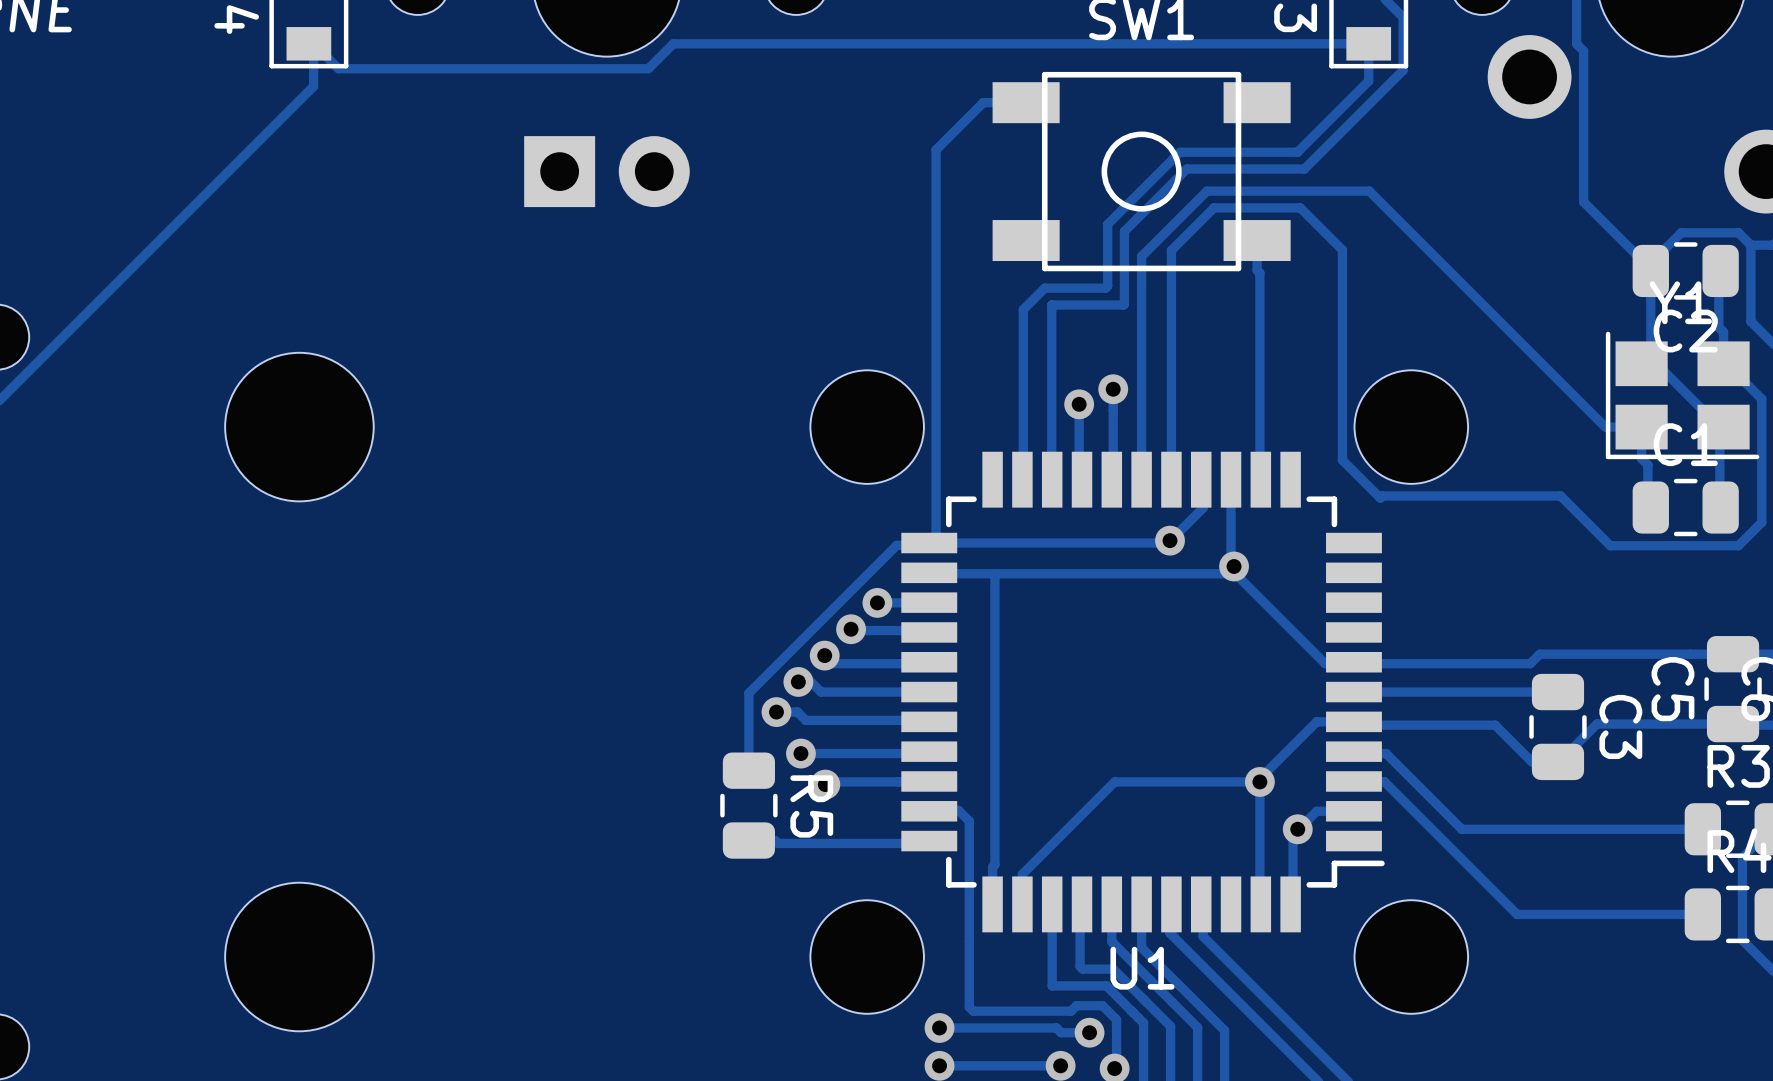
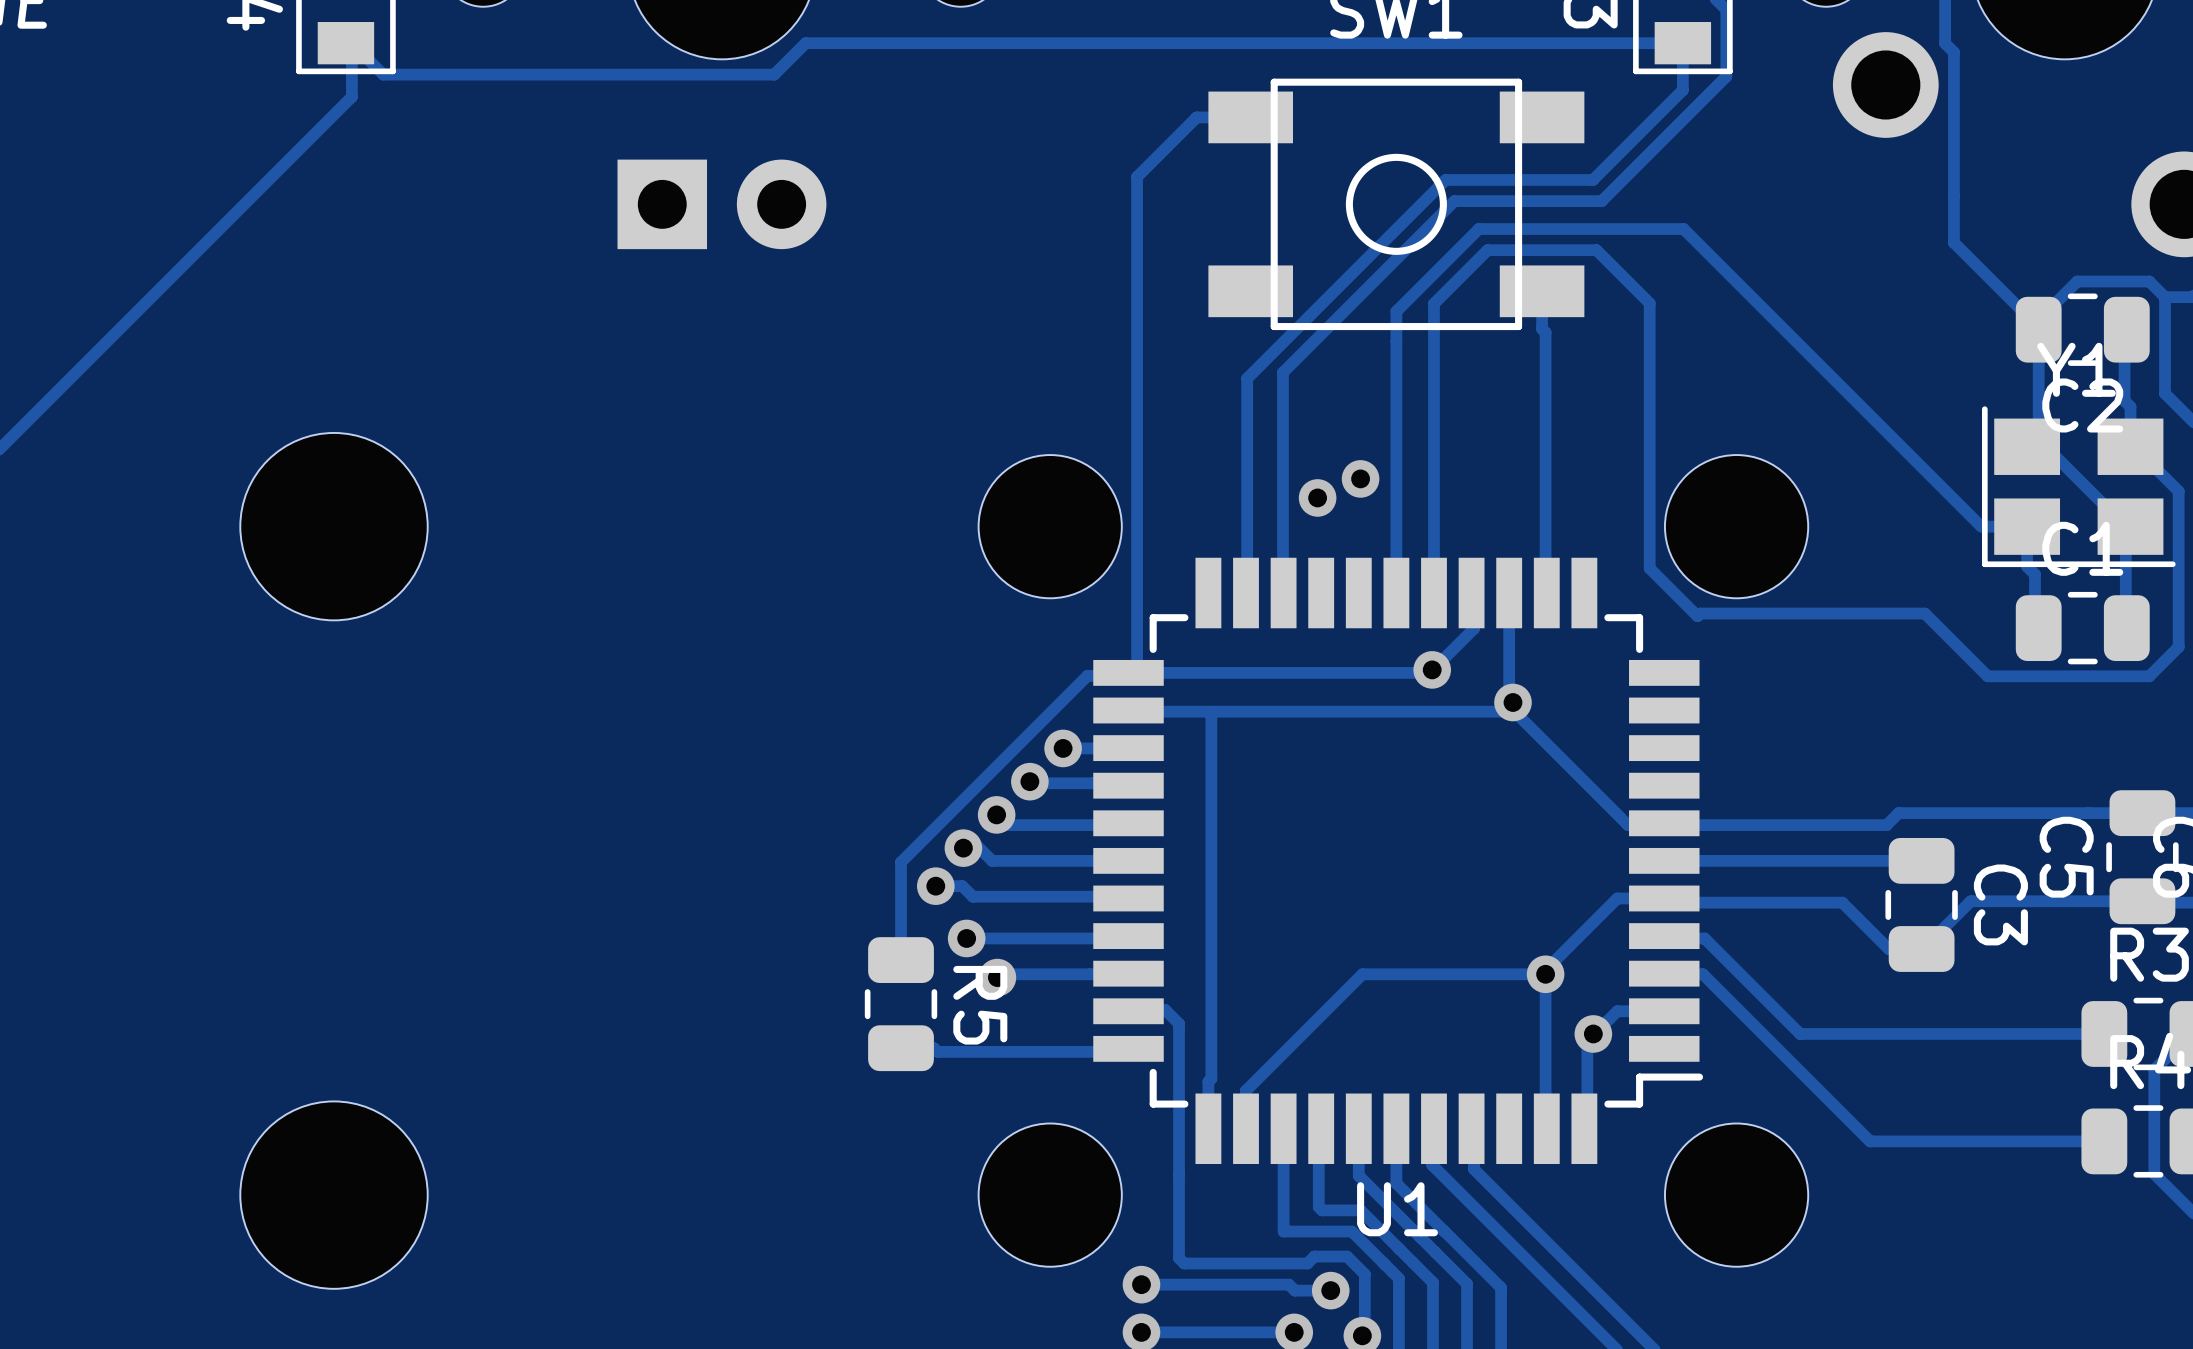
track: (1179, 152) (1107, 224) (1107, 285) (1105, 288) (1044, 288) -> (1445, 179) (1274, 351)
track: (1186, 169) (1124, 231) (1124, 304) (1051, 304) -> (1454, 201) (1282, 372)
track: (1113, 389) (1113, 479) -> none
track: (1079, 404) (1079, 468) (1084, 474) -> none

